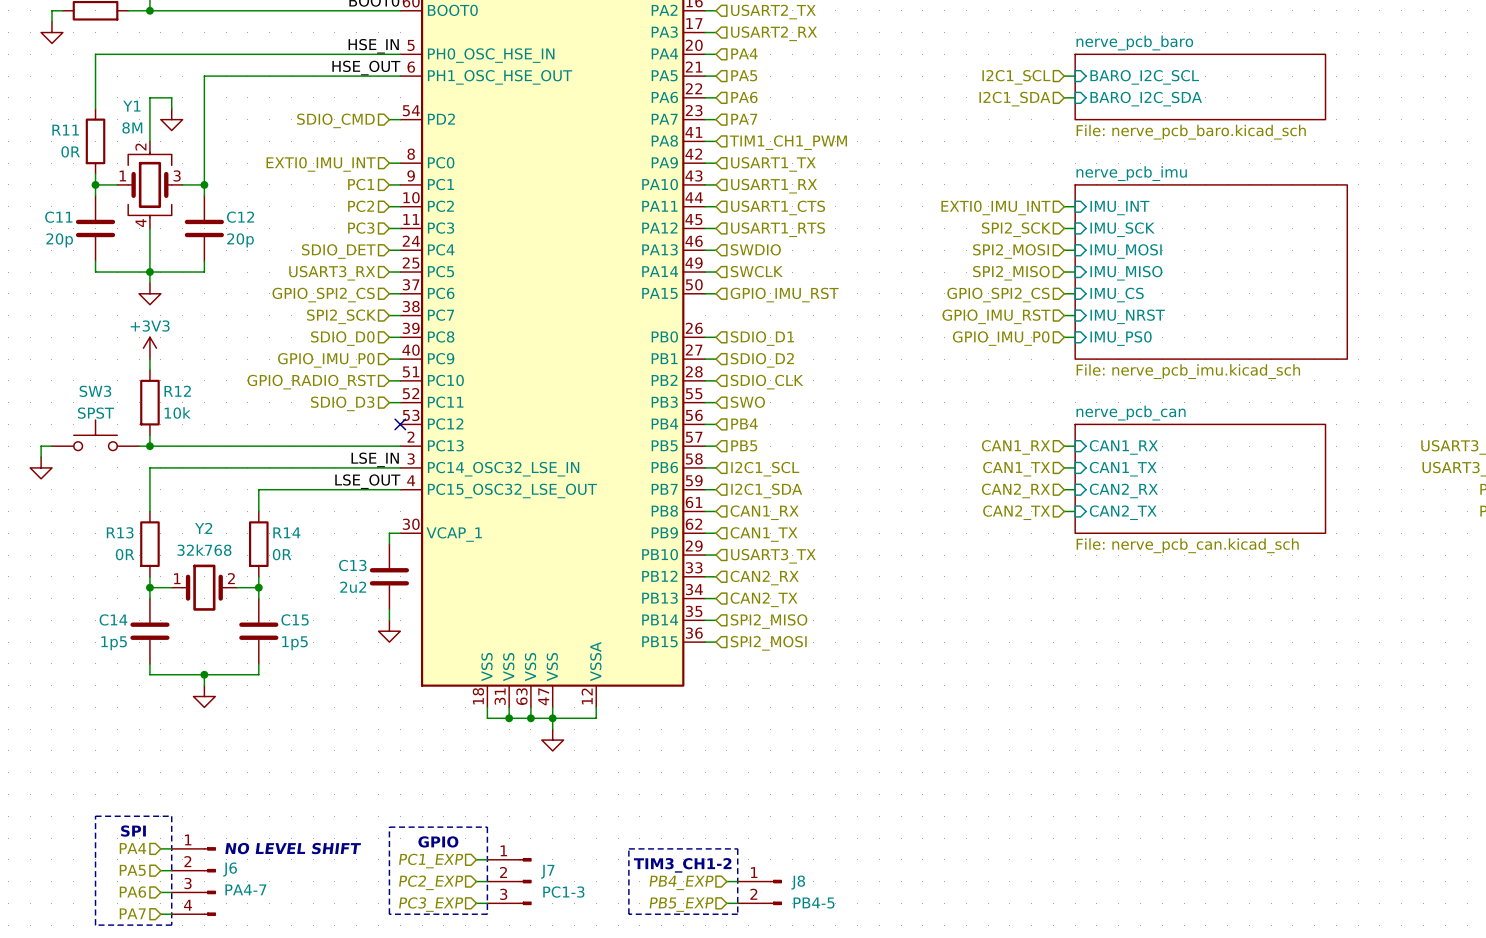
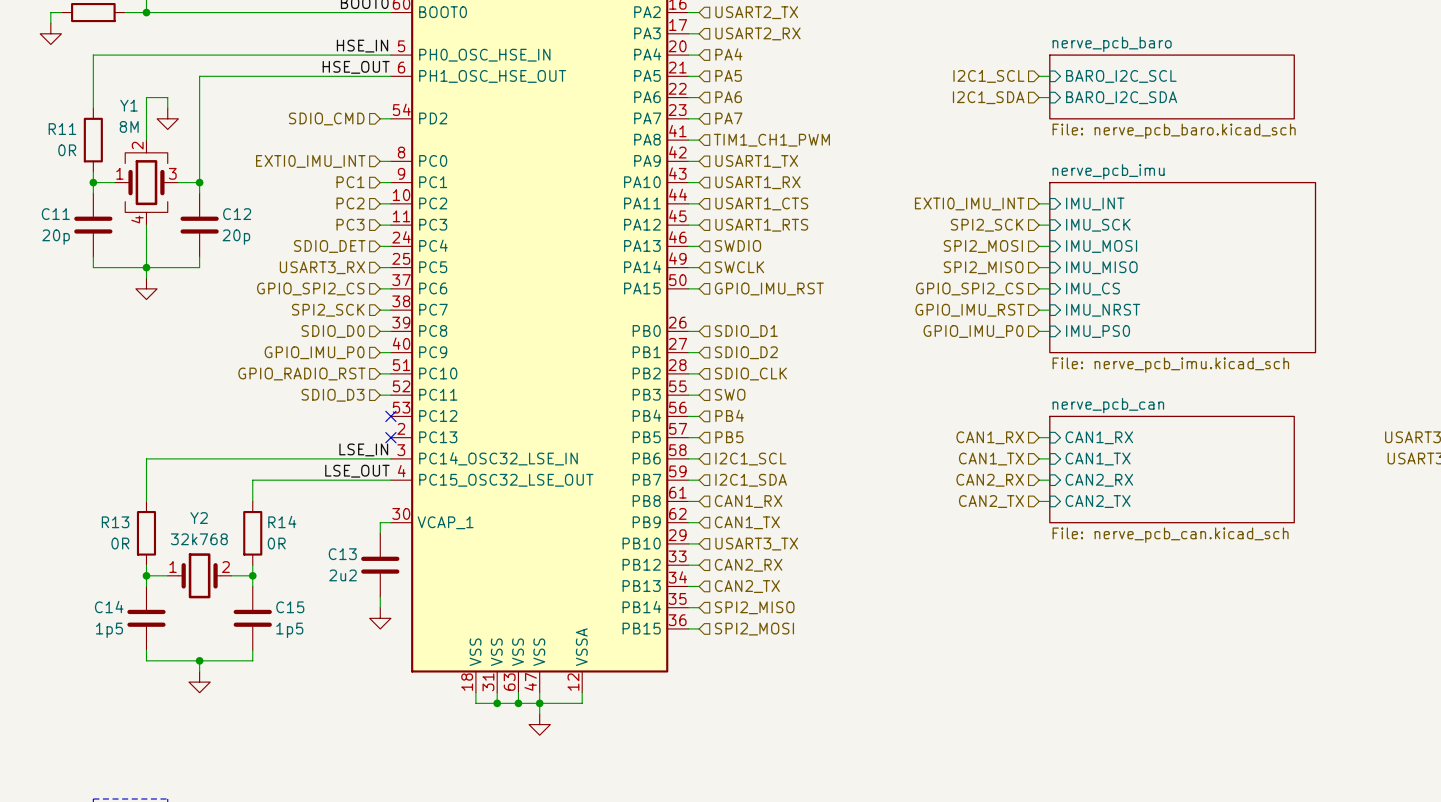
power symbol: +3V3 (149, 348) -> none
wire: (149, 359) (149, 369) -> none
R12: 10k (149, 402) -> none
SW3: SPST (95, 435) -> none
wire: (149, 435) (149, 446) -> none
wire: (51, 446) (41, 446) (41, 457) -> none
wire: (139, 446) (400, 446) -> none
junction: (149, 446) -> none
no-connect mark: none -> (390, 437)
power symbol: (41, 467) -> none

